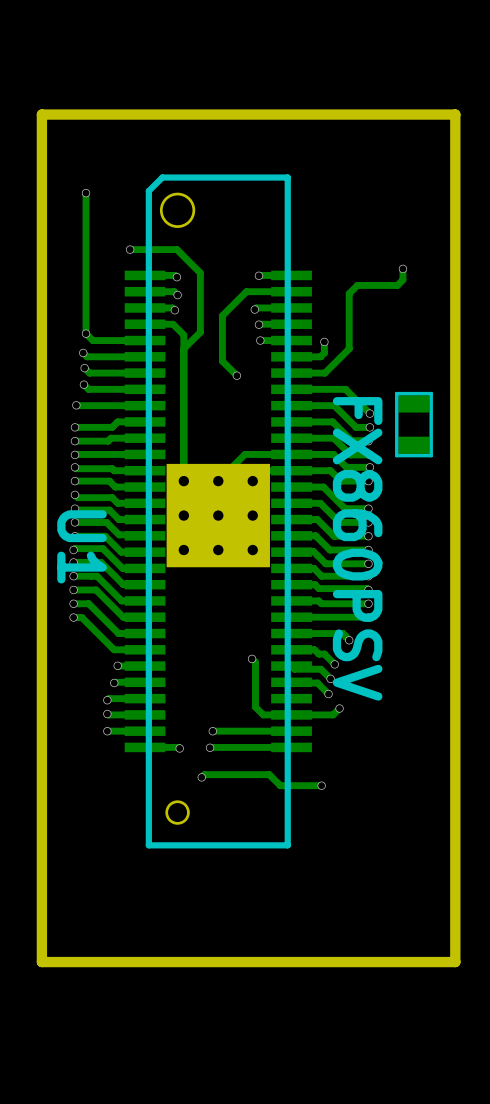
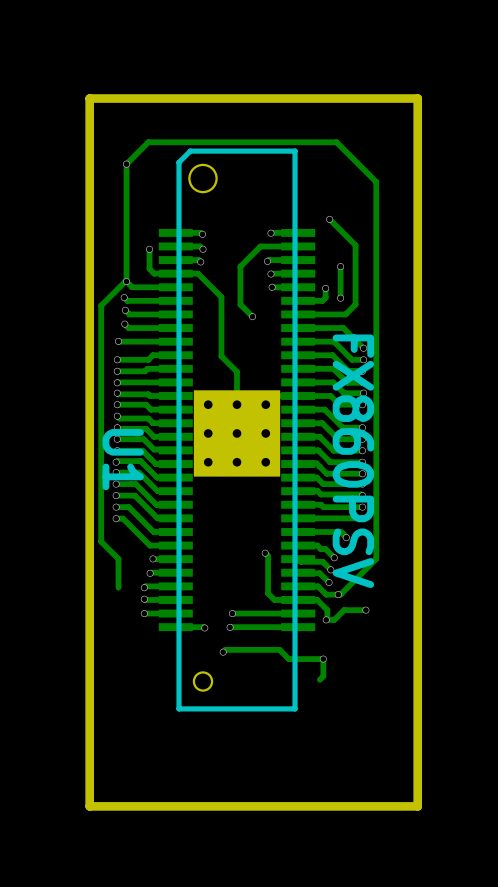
board edge: (434, 114) (455, 114) (455, 962) (434, 962) -> (417, 98) (417, 806)
track: none -> (126, 164) (148, 142) (336, 142) (376, 181) (376, 558) (340, 594) (326, 594) (317, 586) (298, 586)
track: (130, 249) (176, 249) (200, 273) (200, 332) (183, 348) -> none
via position: (130, 249) -> (149, 249)
via: none -> (329, 219)
track: (402, 268) (402, 279) (397, 285) (357, 285) (349, 293) (349, 348) (324, 373) -> (329, 219) (355, 245) (355, 304) (345, 314) (326, 314)
via: (402, 268) -> none
track: none -> (149, 249) (149, 268) (154, 273) (175, 273)
track: none -> (340, 266) (340, 298)
via: none -> (340, 266)
track: (171, 324) (183, 335) (183, 481) -> (198, 273) (221, 297) (221, 356) (237, 371) (237, 404)
track: none -> (126, 281) (101, 305) (101, 541) (118, 558) (118, 587)
via: none -> (340, 298)
part: (413, 424) -> none
track: (291, 454) (244, 454) (228, 470) -> none
track: (339, 708) (333, 714) (314, 714) -> (365, 610) (344, 610) (334, 619) (326, 619) (327, 610) (317, 599)
via: none -> (365, 610)
via: none -> (326, 619)
track: none -> (323, 659) (323, 676) (319, 679)

